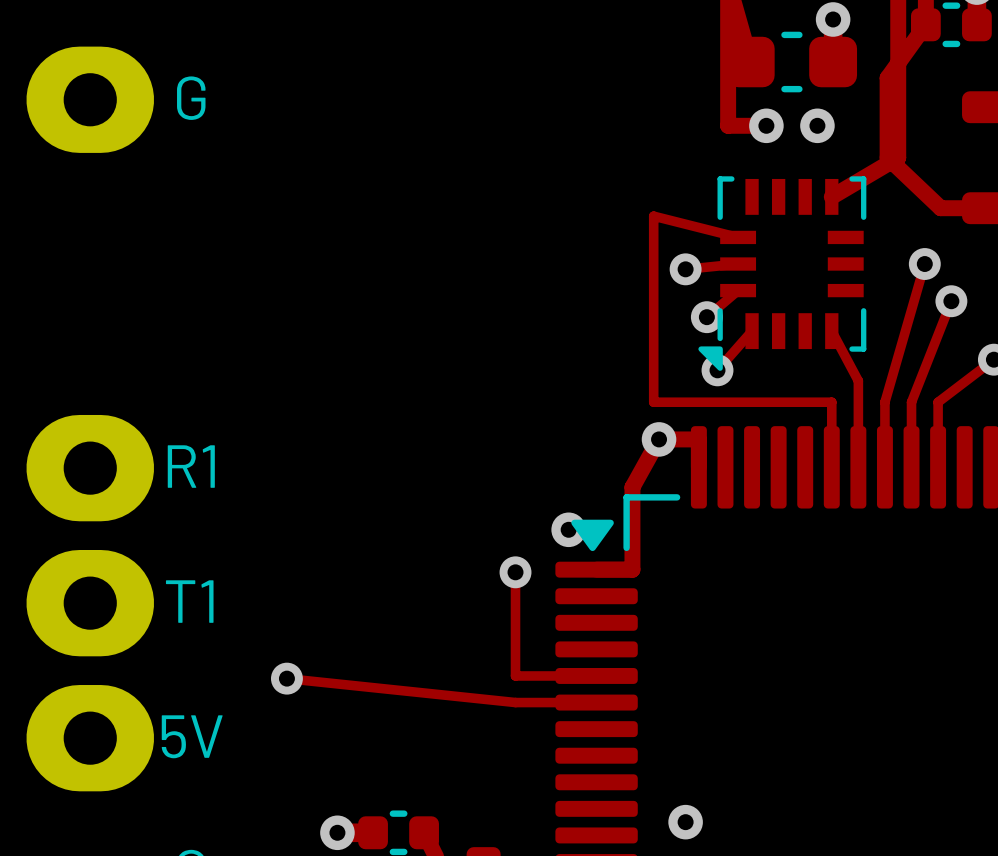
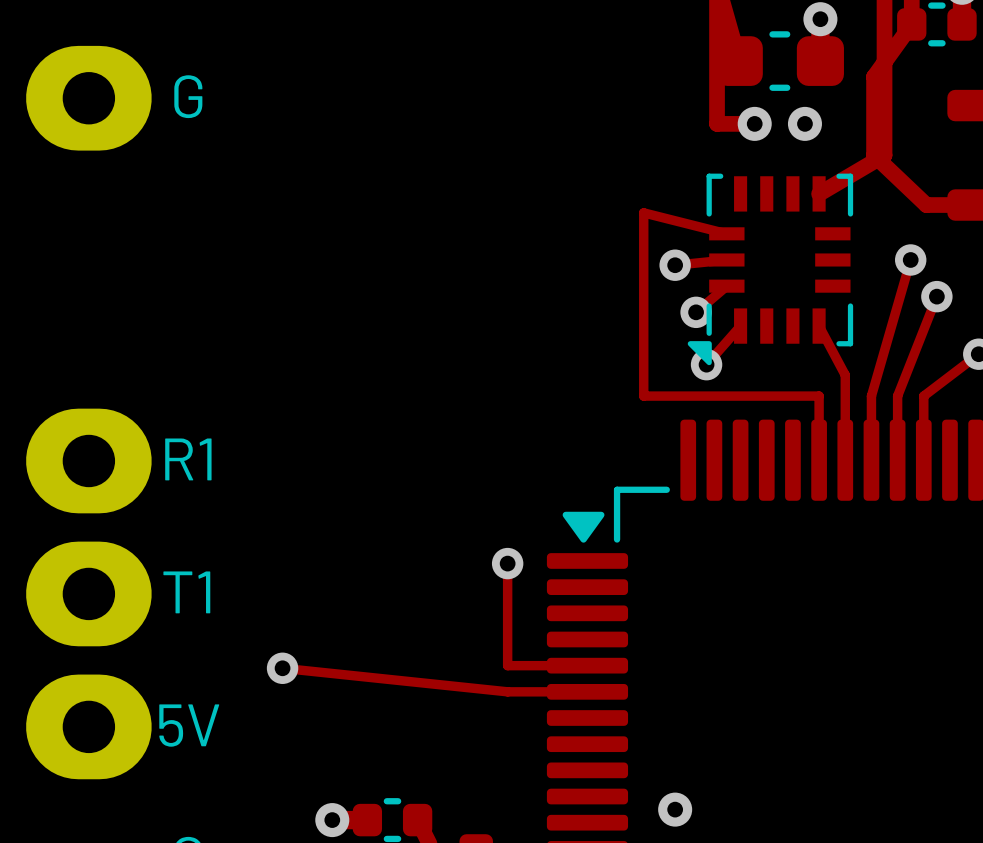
via: (659, 439) -> none
track: (698, 467) (698, 439) (659, 439) (632, 487) (632, 569) (596, 569) -> none
via: (568, 529) -> none

